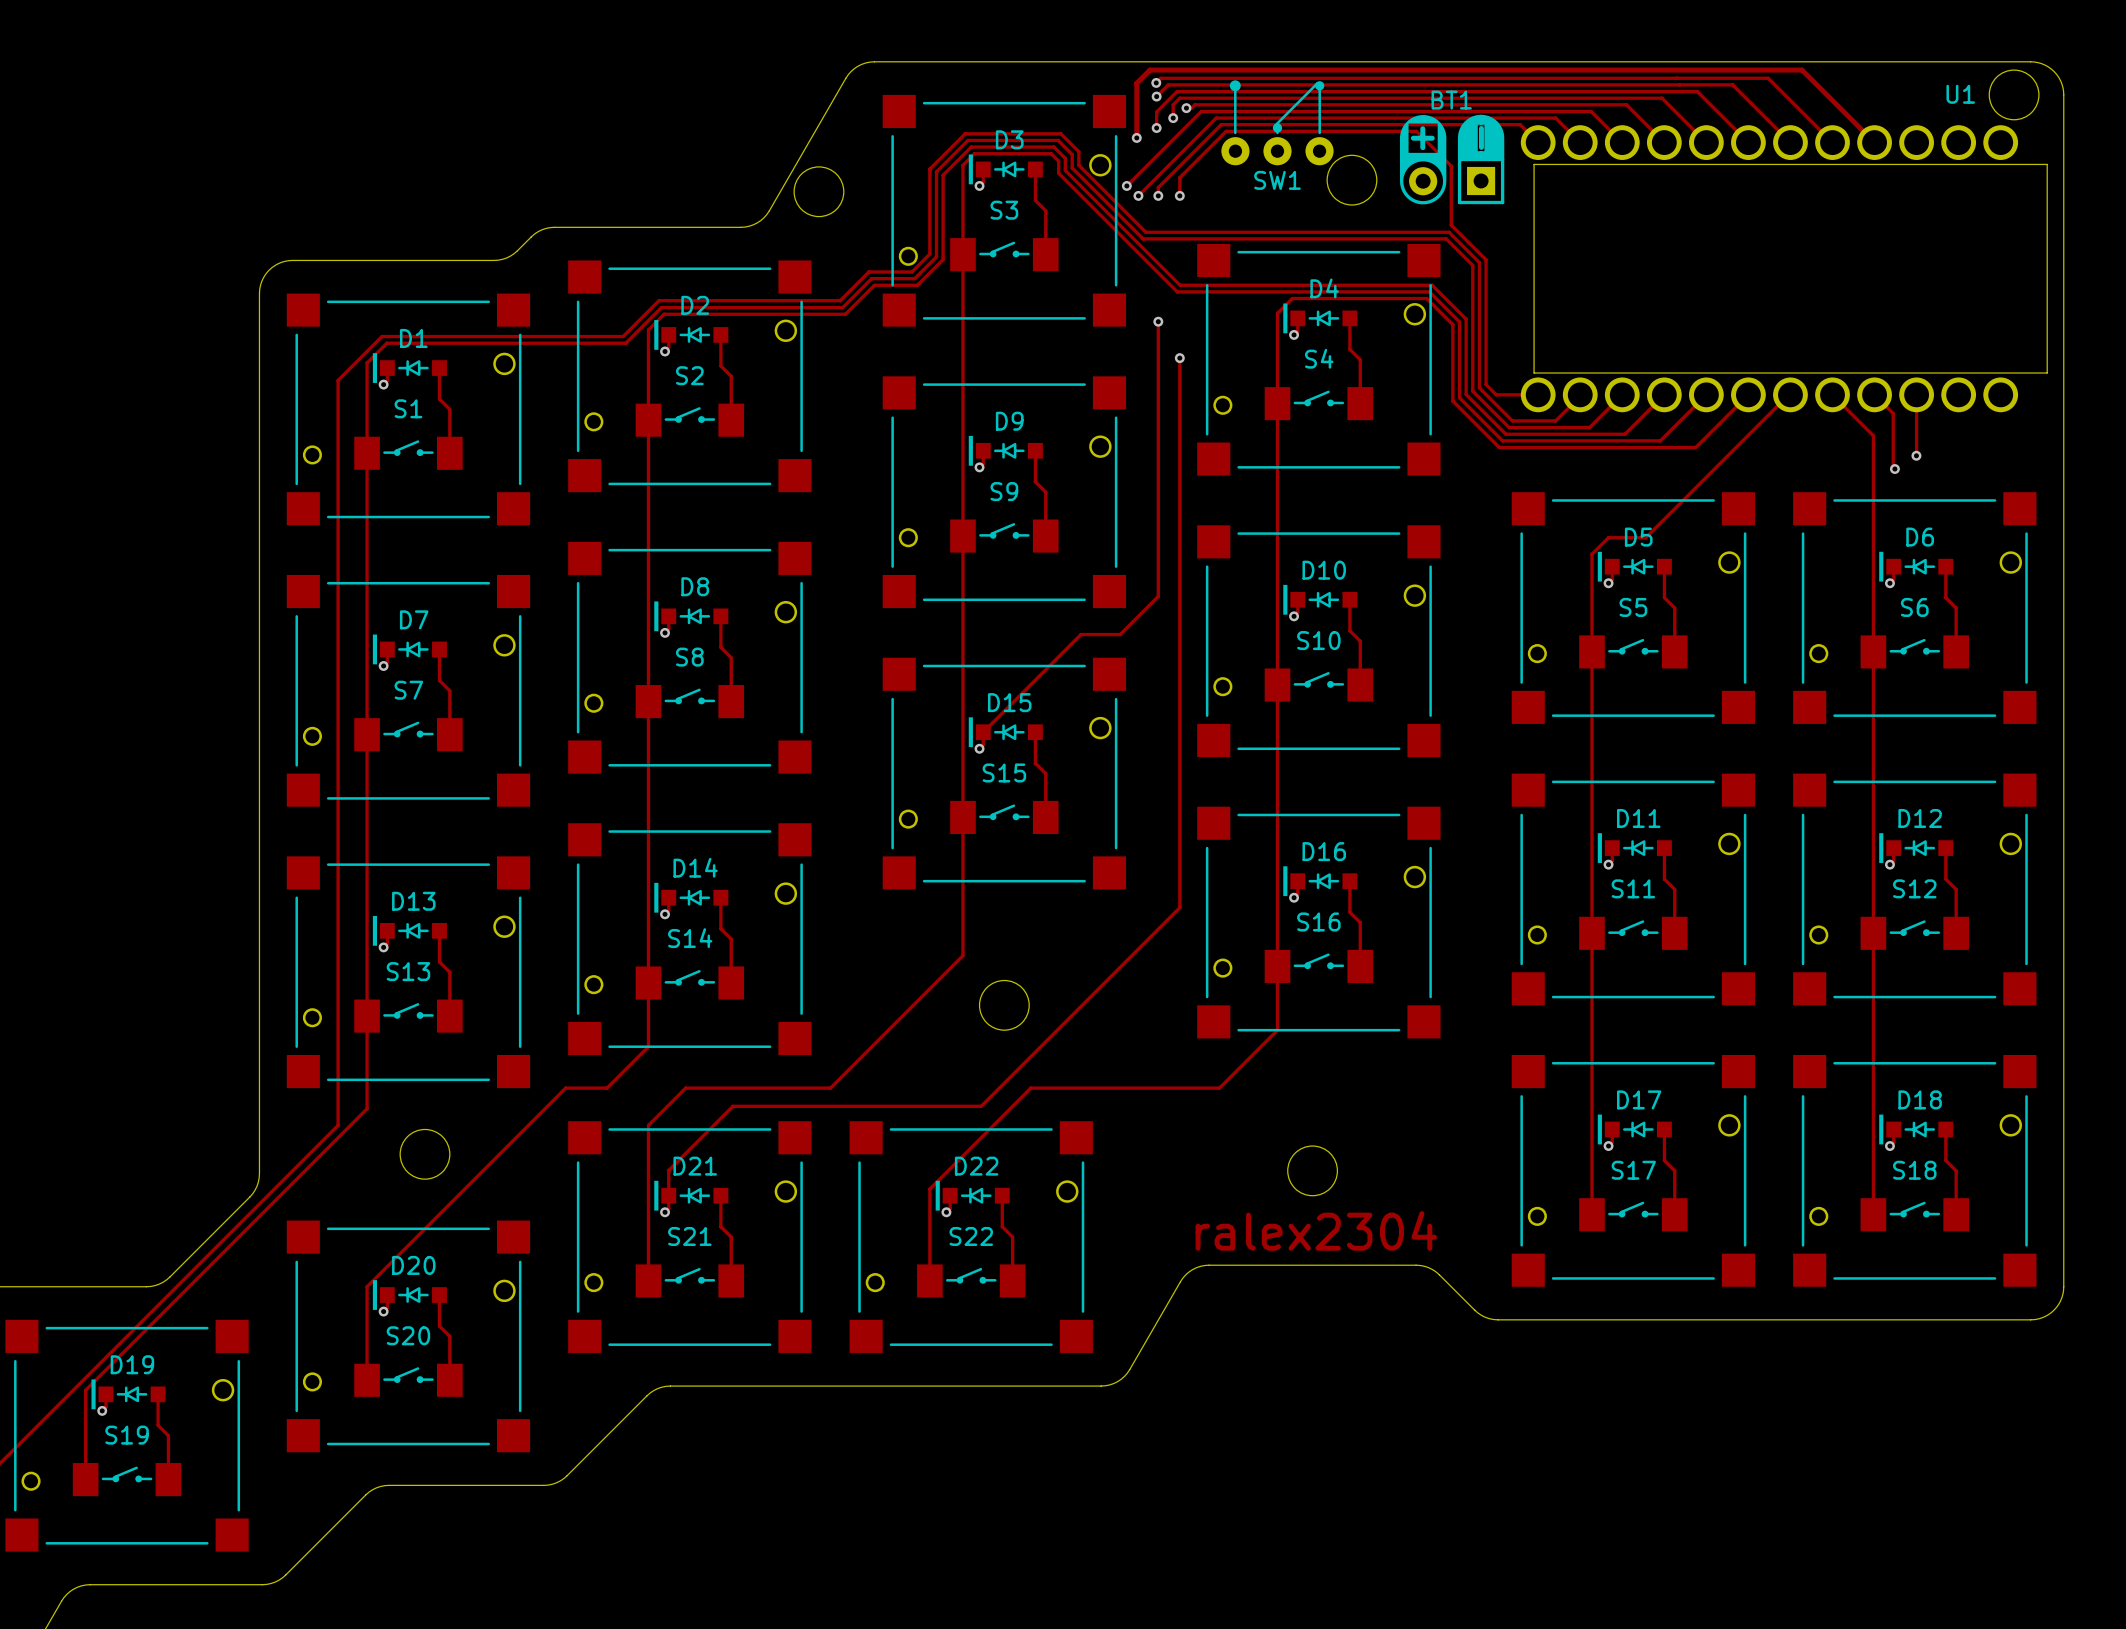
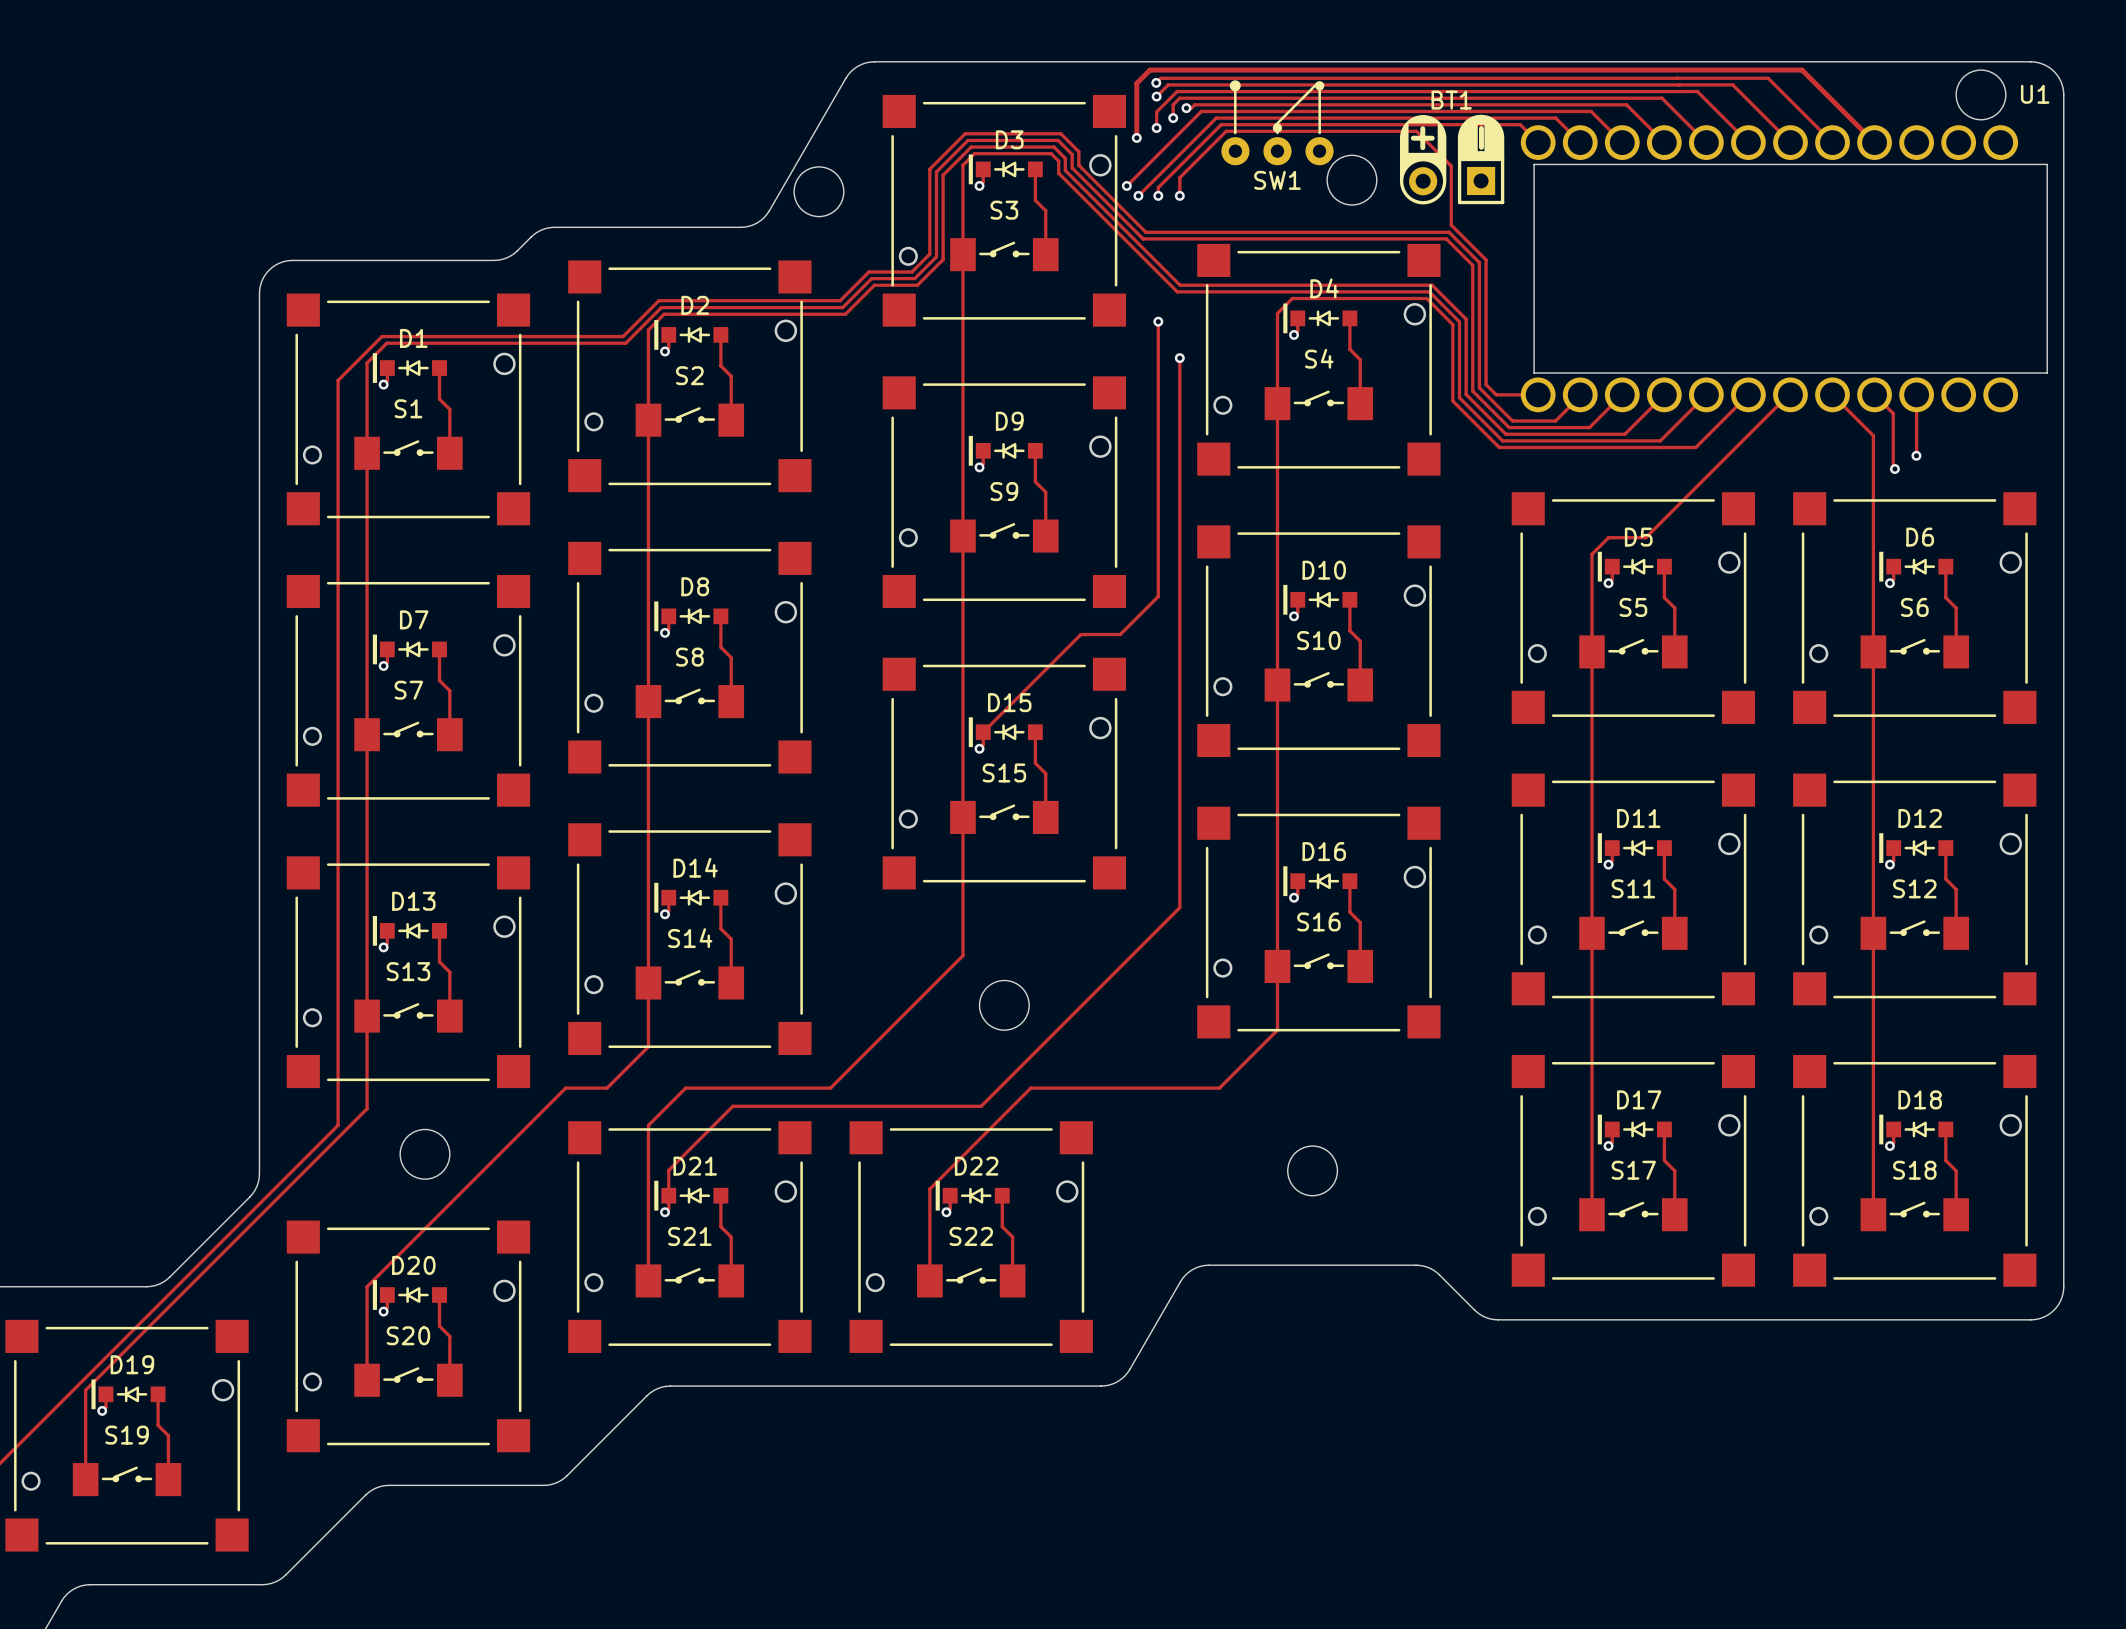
U1 name position: U1 (1960, 94) -> U1 (2035, 94)
round board edge position: (2014, 94) -> (1980, 94)
text: ralex2304 (1316, 1230) -> none

